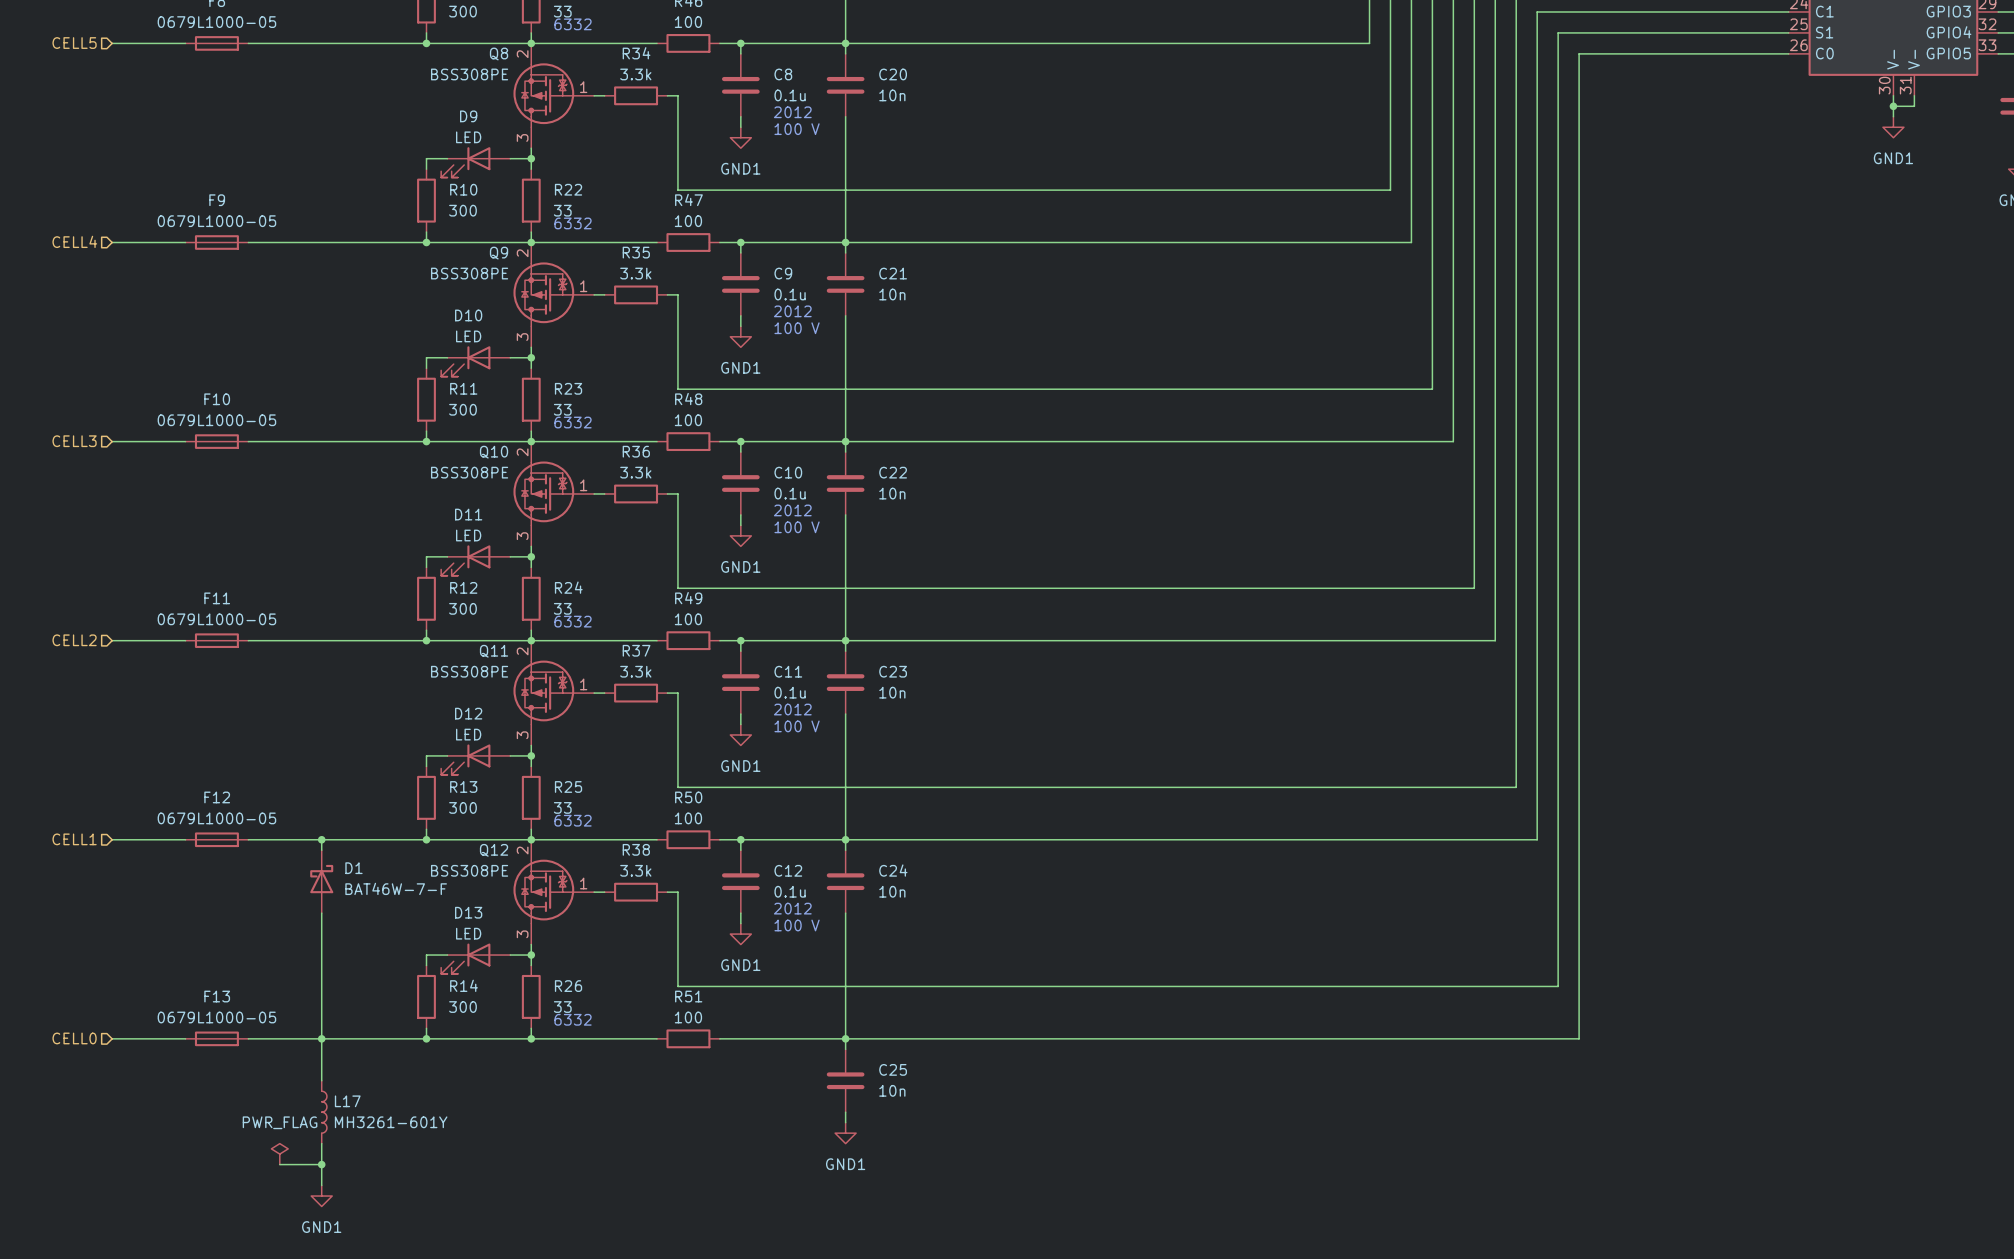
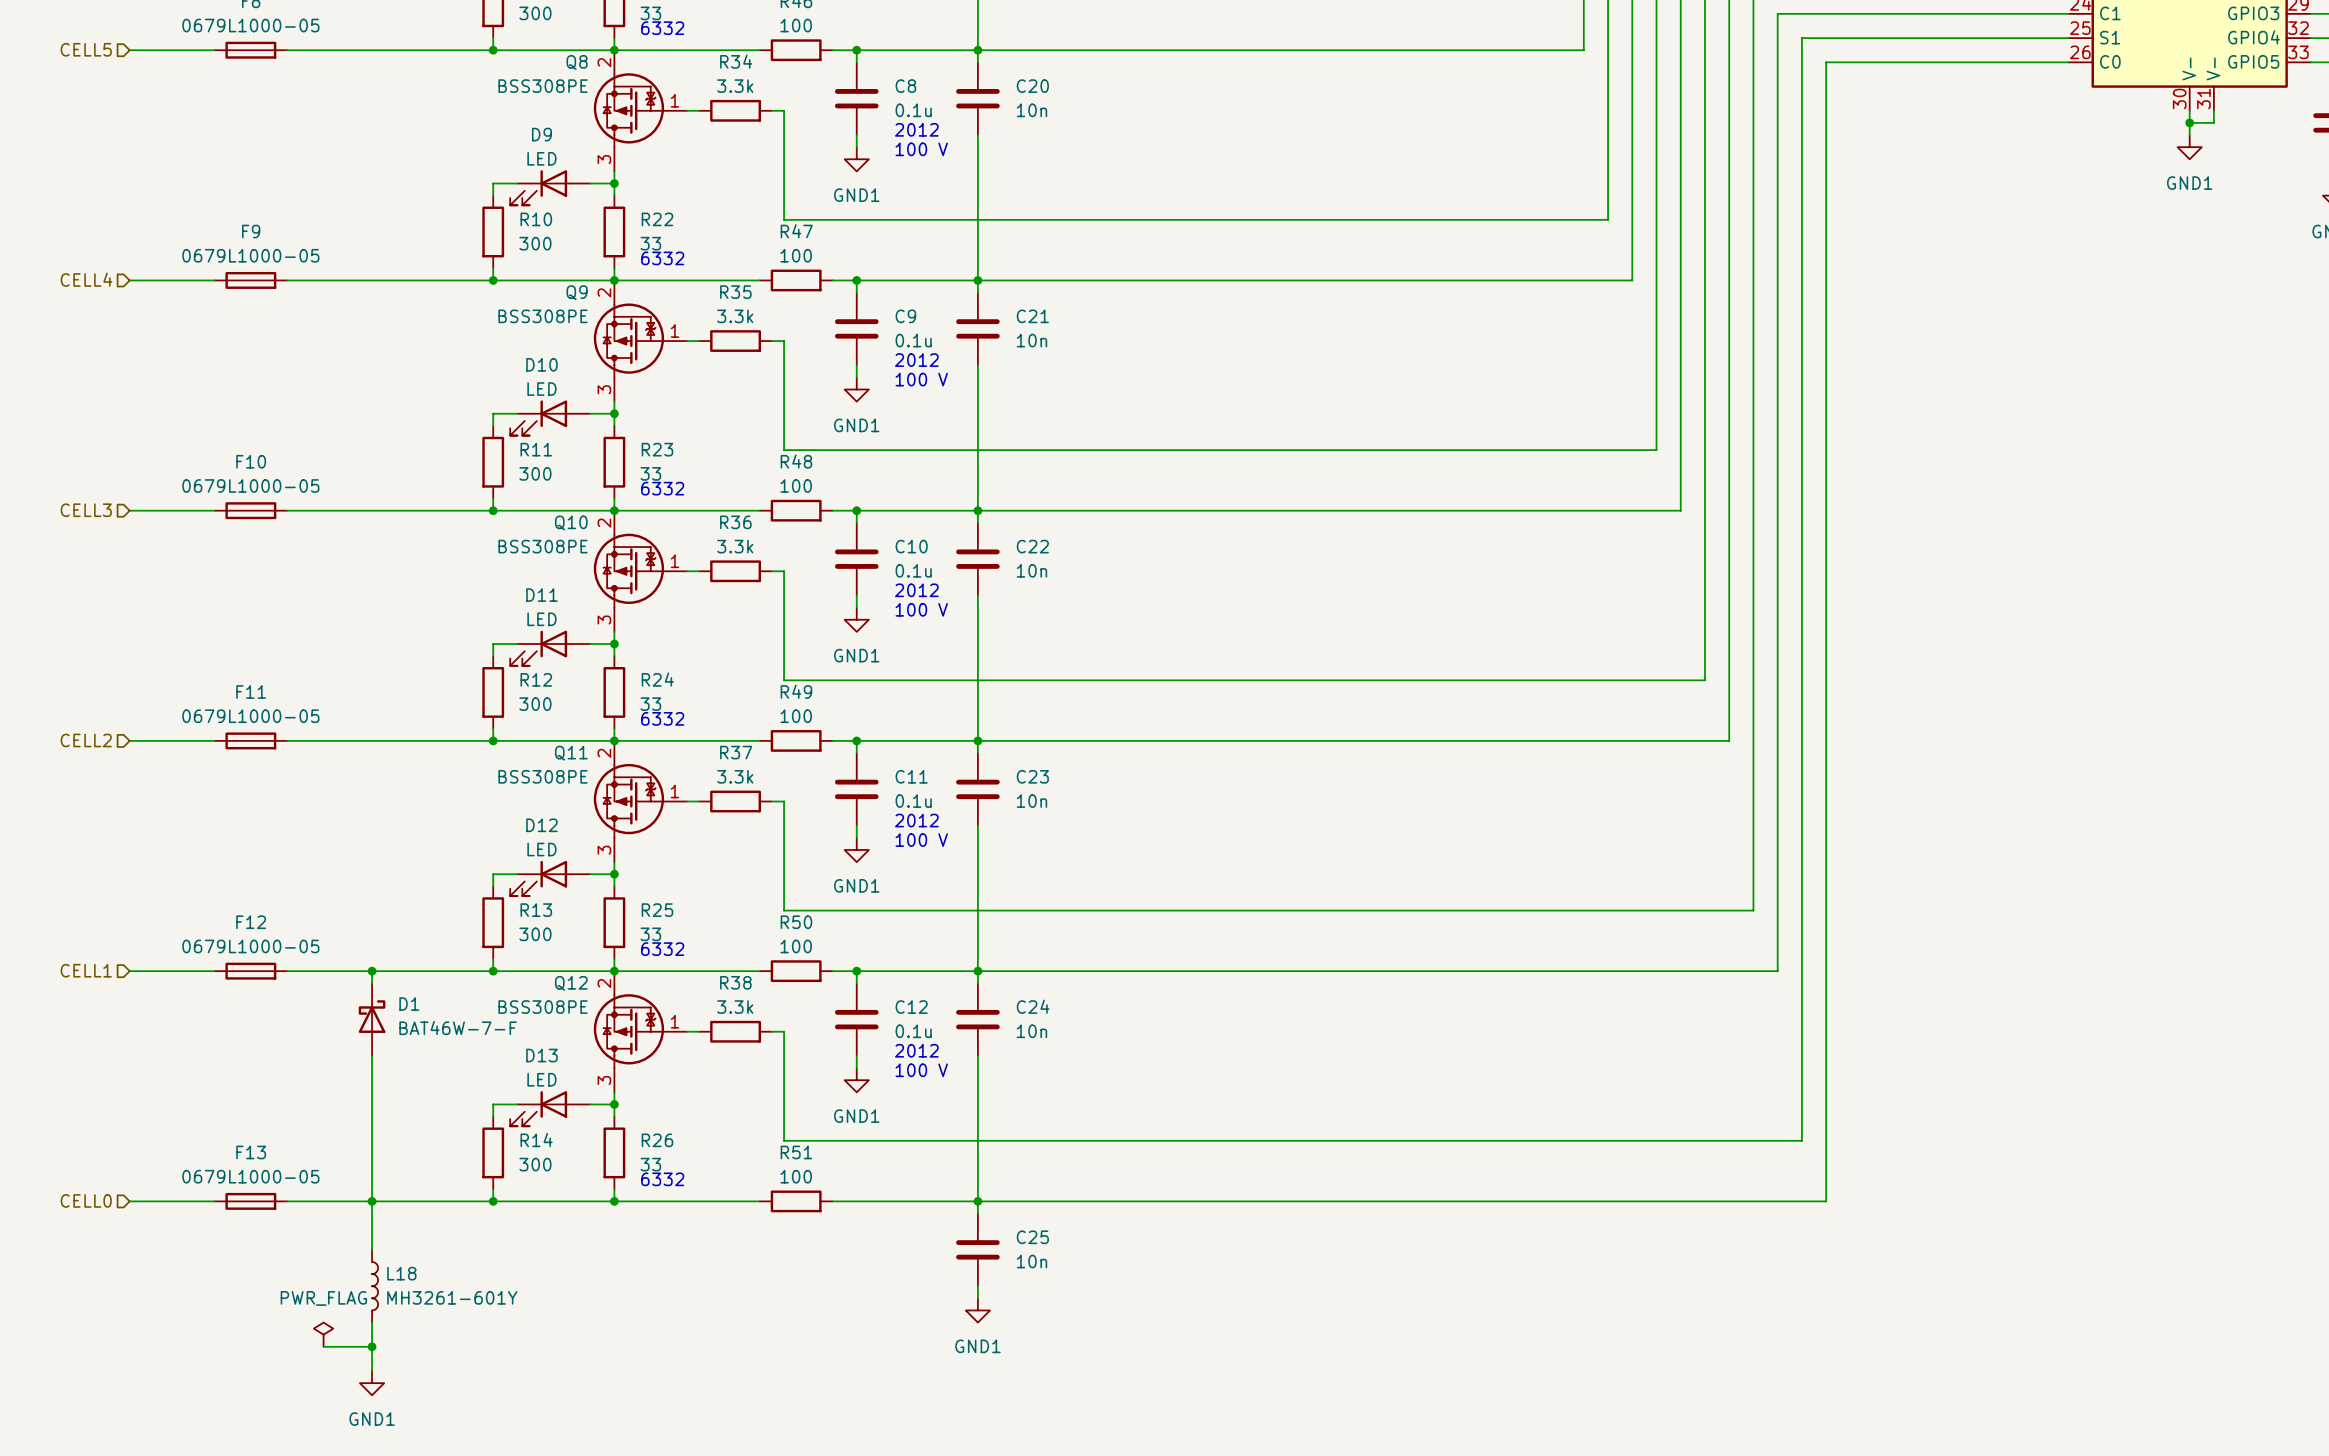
L17 name: L17 (347, 1101) -> L18 (401, 1273)

